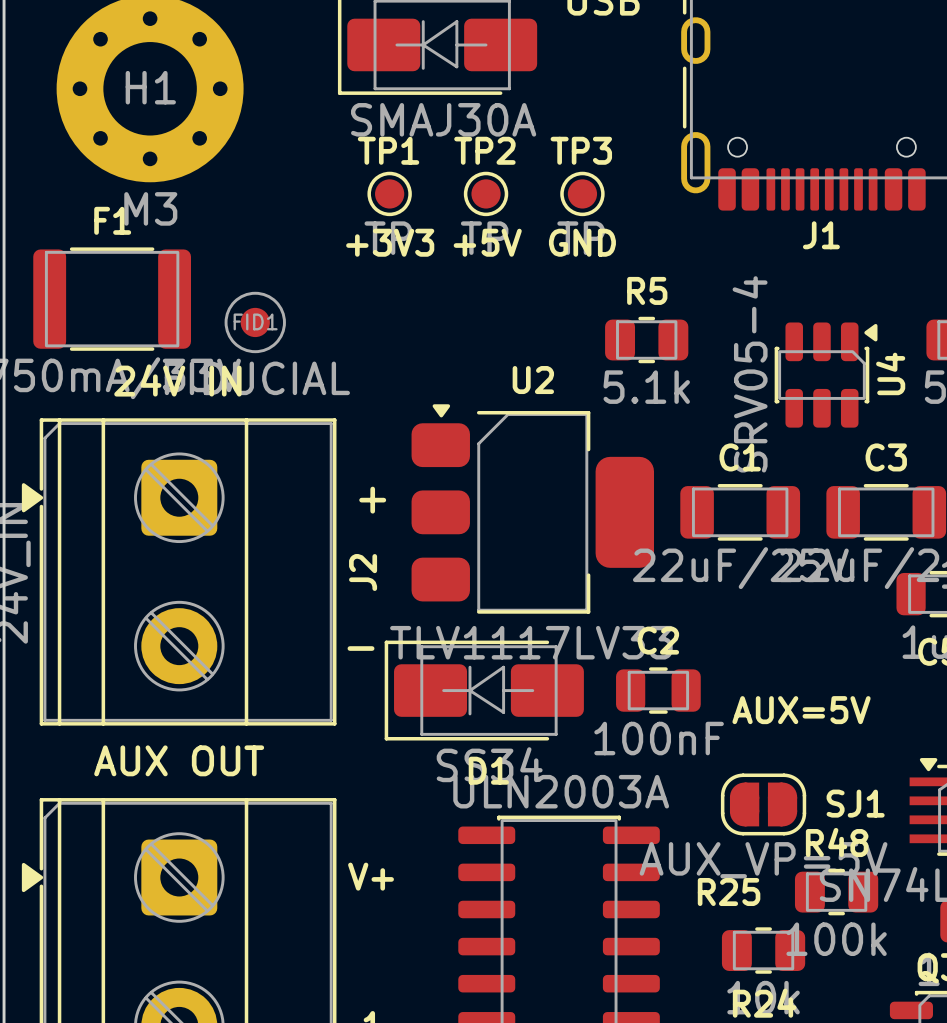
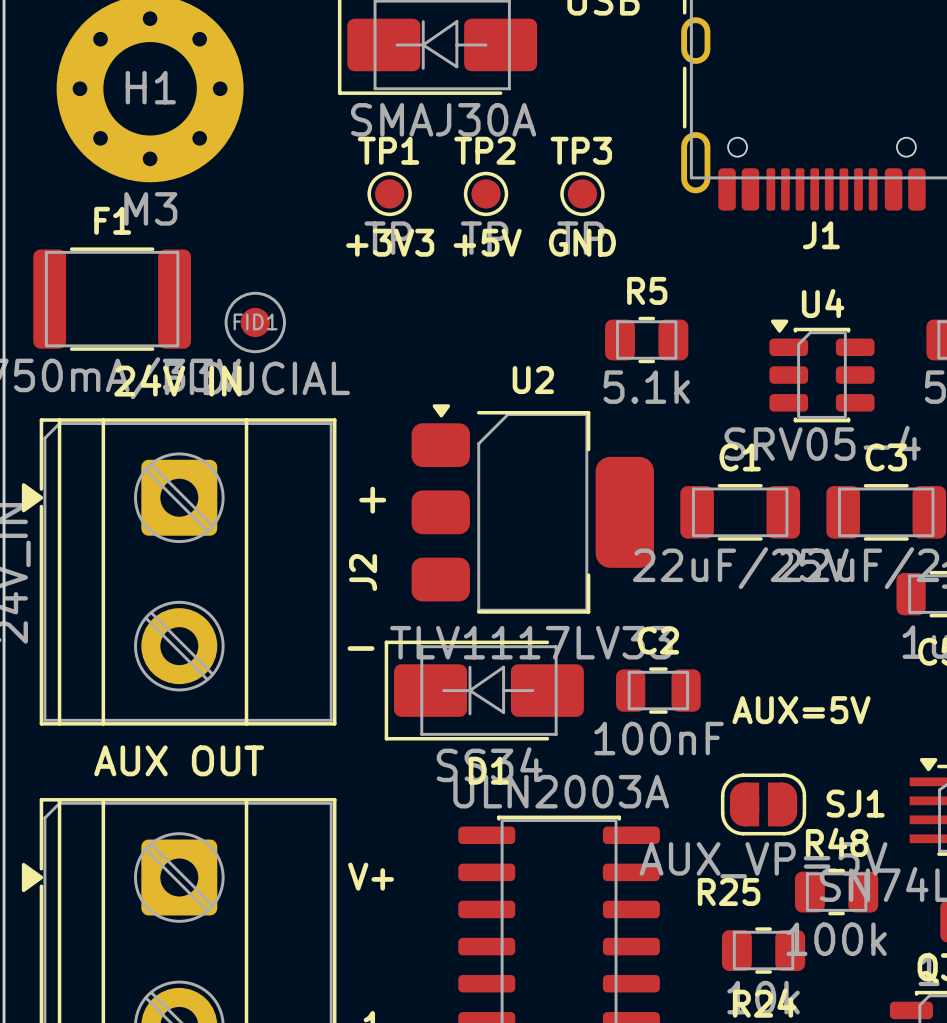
U4 rotation: 0° (826, 375) -> 90° counterclockwise (821, 370)

